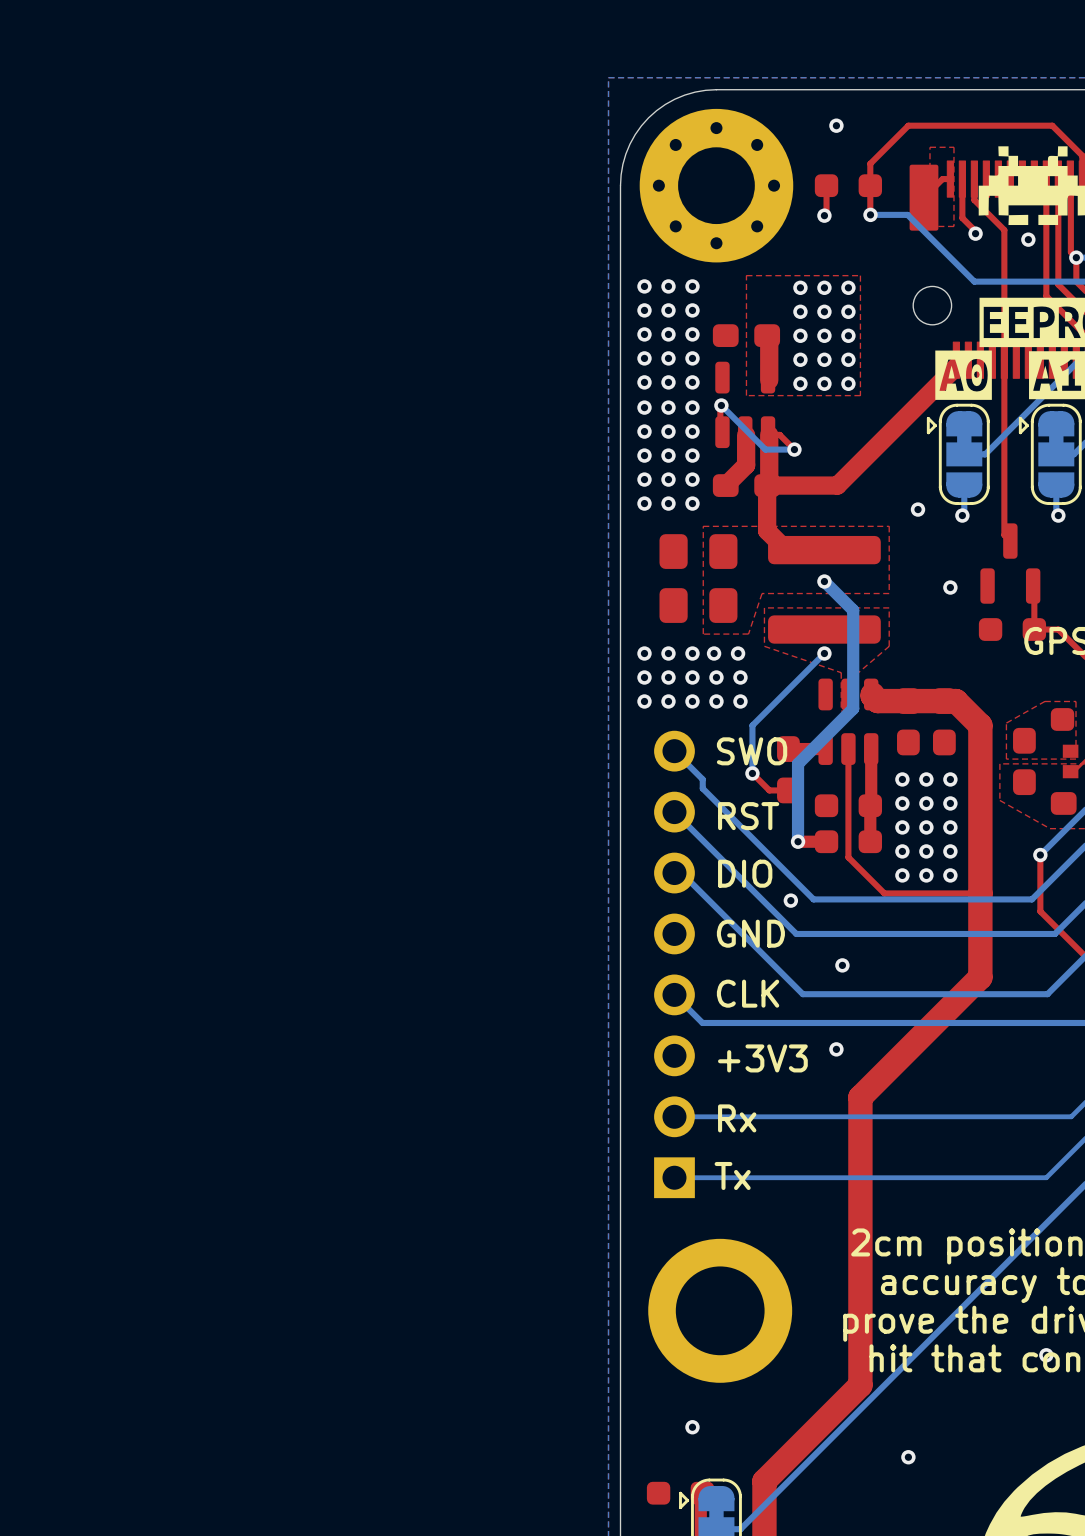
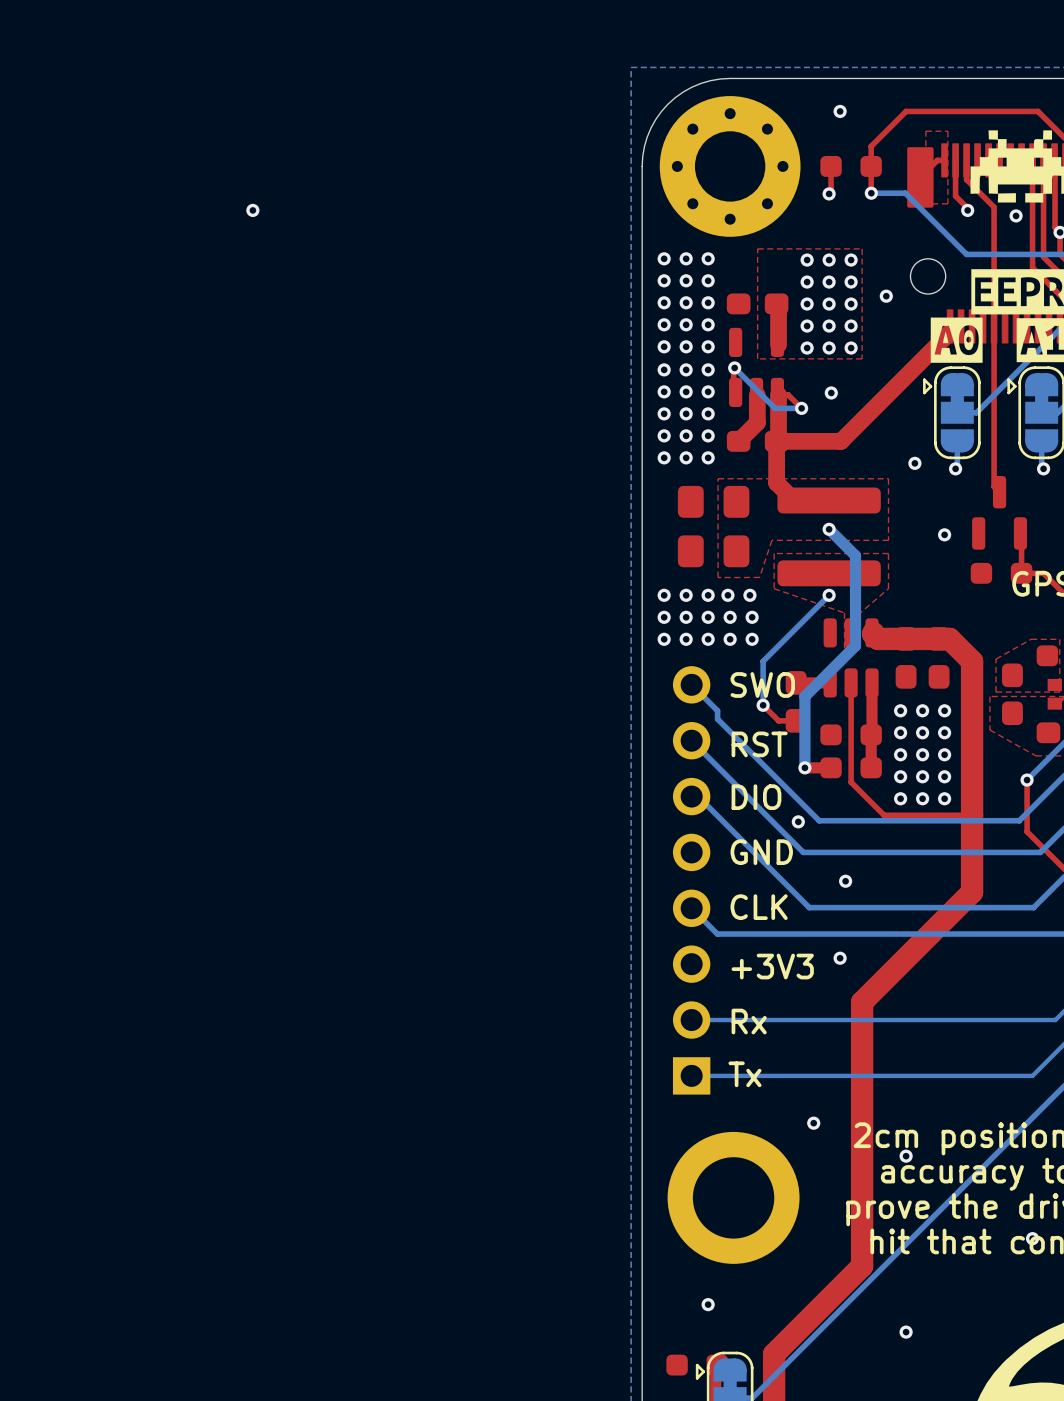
via: none -> (252, 210)
via: none -> (886, 296)
via: none -> (831, 392)
via: none -> (813, 1123)
via: none -> (906, 1156)

